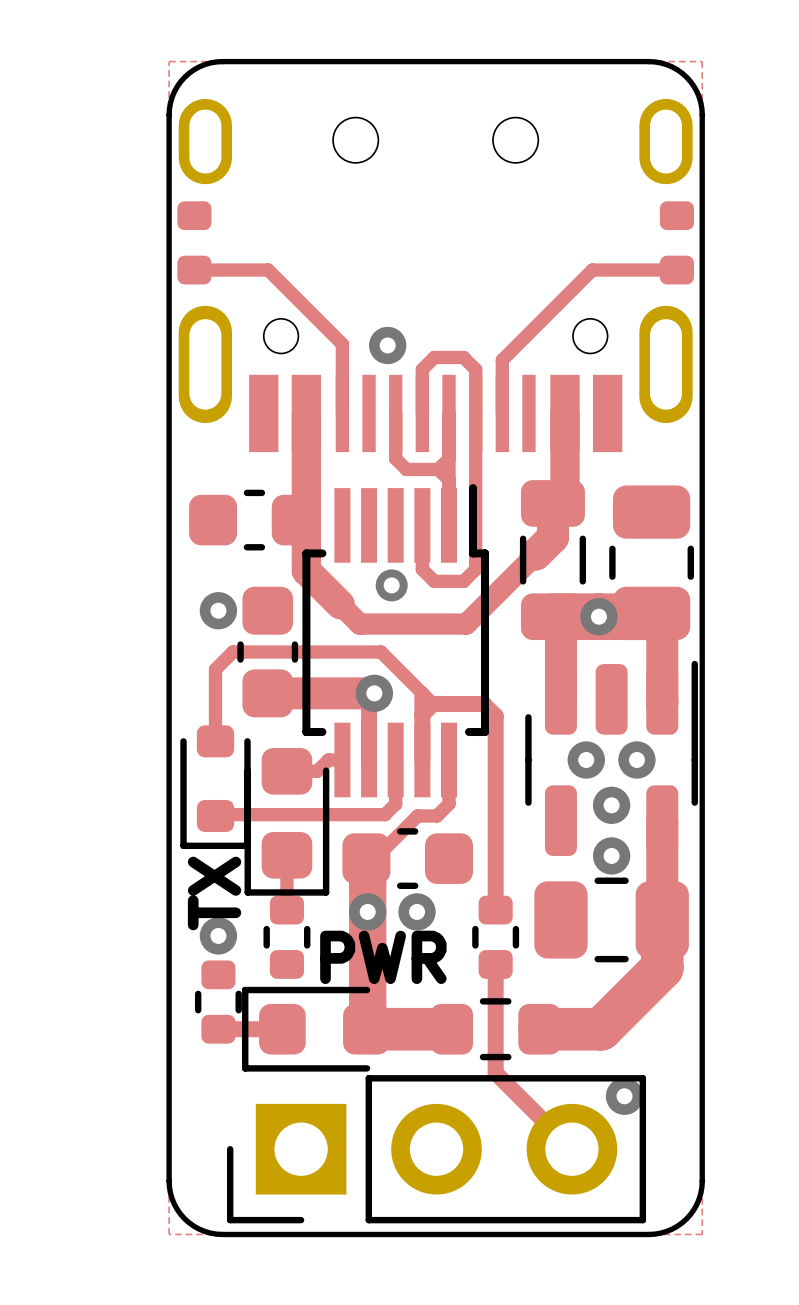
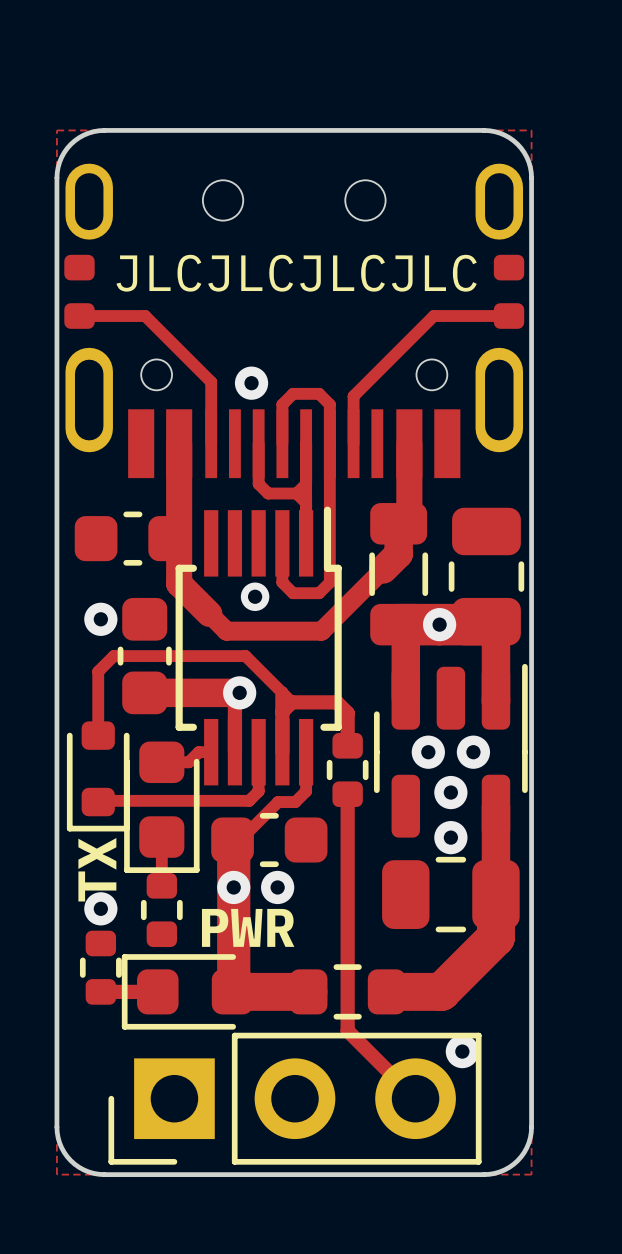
text: none -> JLCJLCJLCJLC (296, 273)
track: (495, 752) (495, 807) -> (347, 885) (347, 934)
part position: (495, 937) -> (347, 770)

